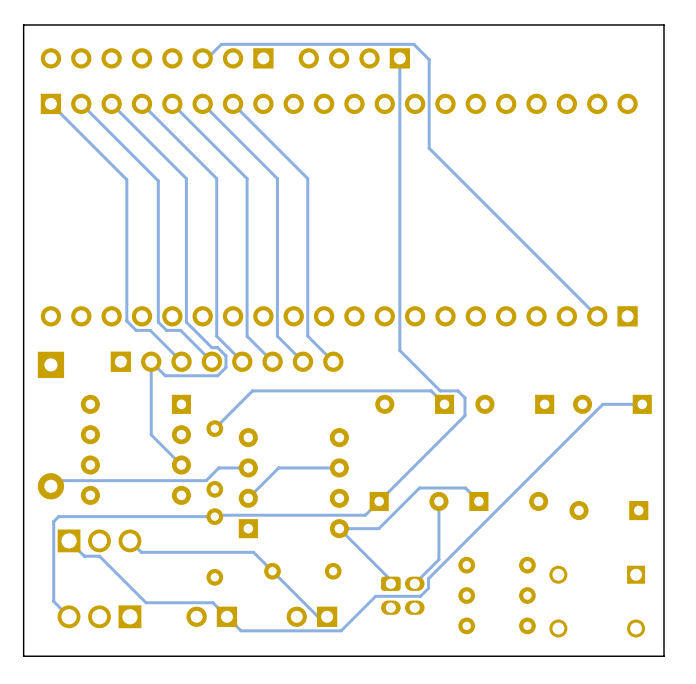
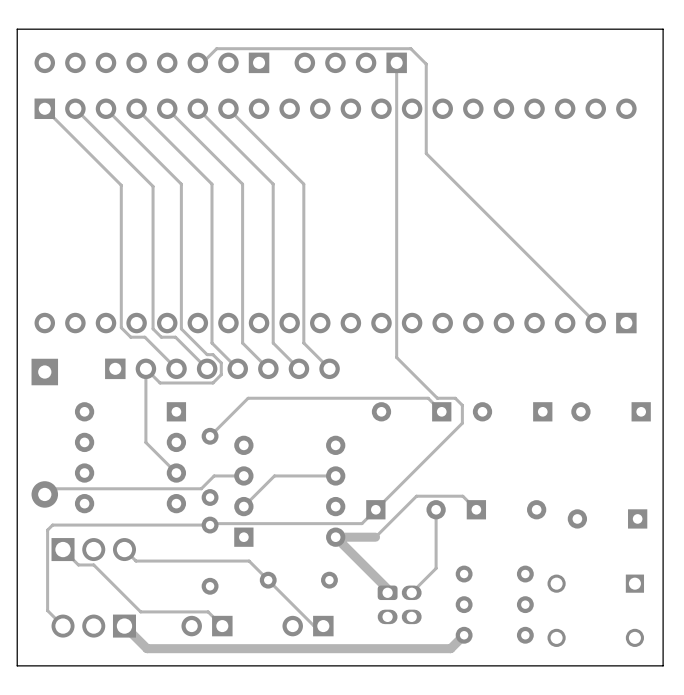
track: (642, 404) (602, 404) (428, 578) (428, 588) (420, 596) (375, 596) (341, 630) (241, 630) (226, 616) -> none
track width: thin (378, 528) (339, 528) (390, 580) -> thick (375, 537) (335, 537) (387, 589)
track: none -> (124, 626) (147, 648) (450, 648) (464, 635)

